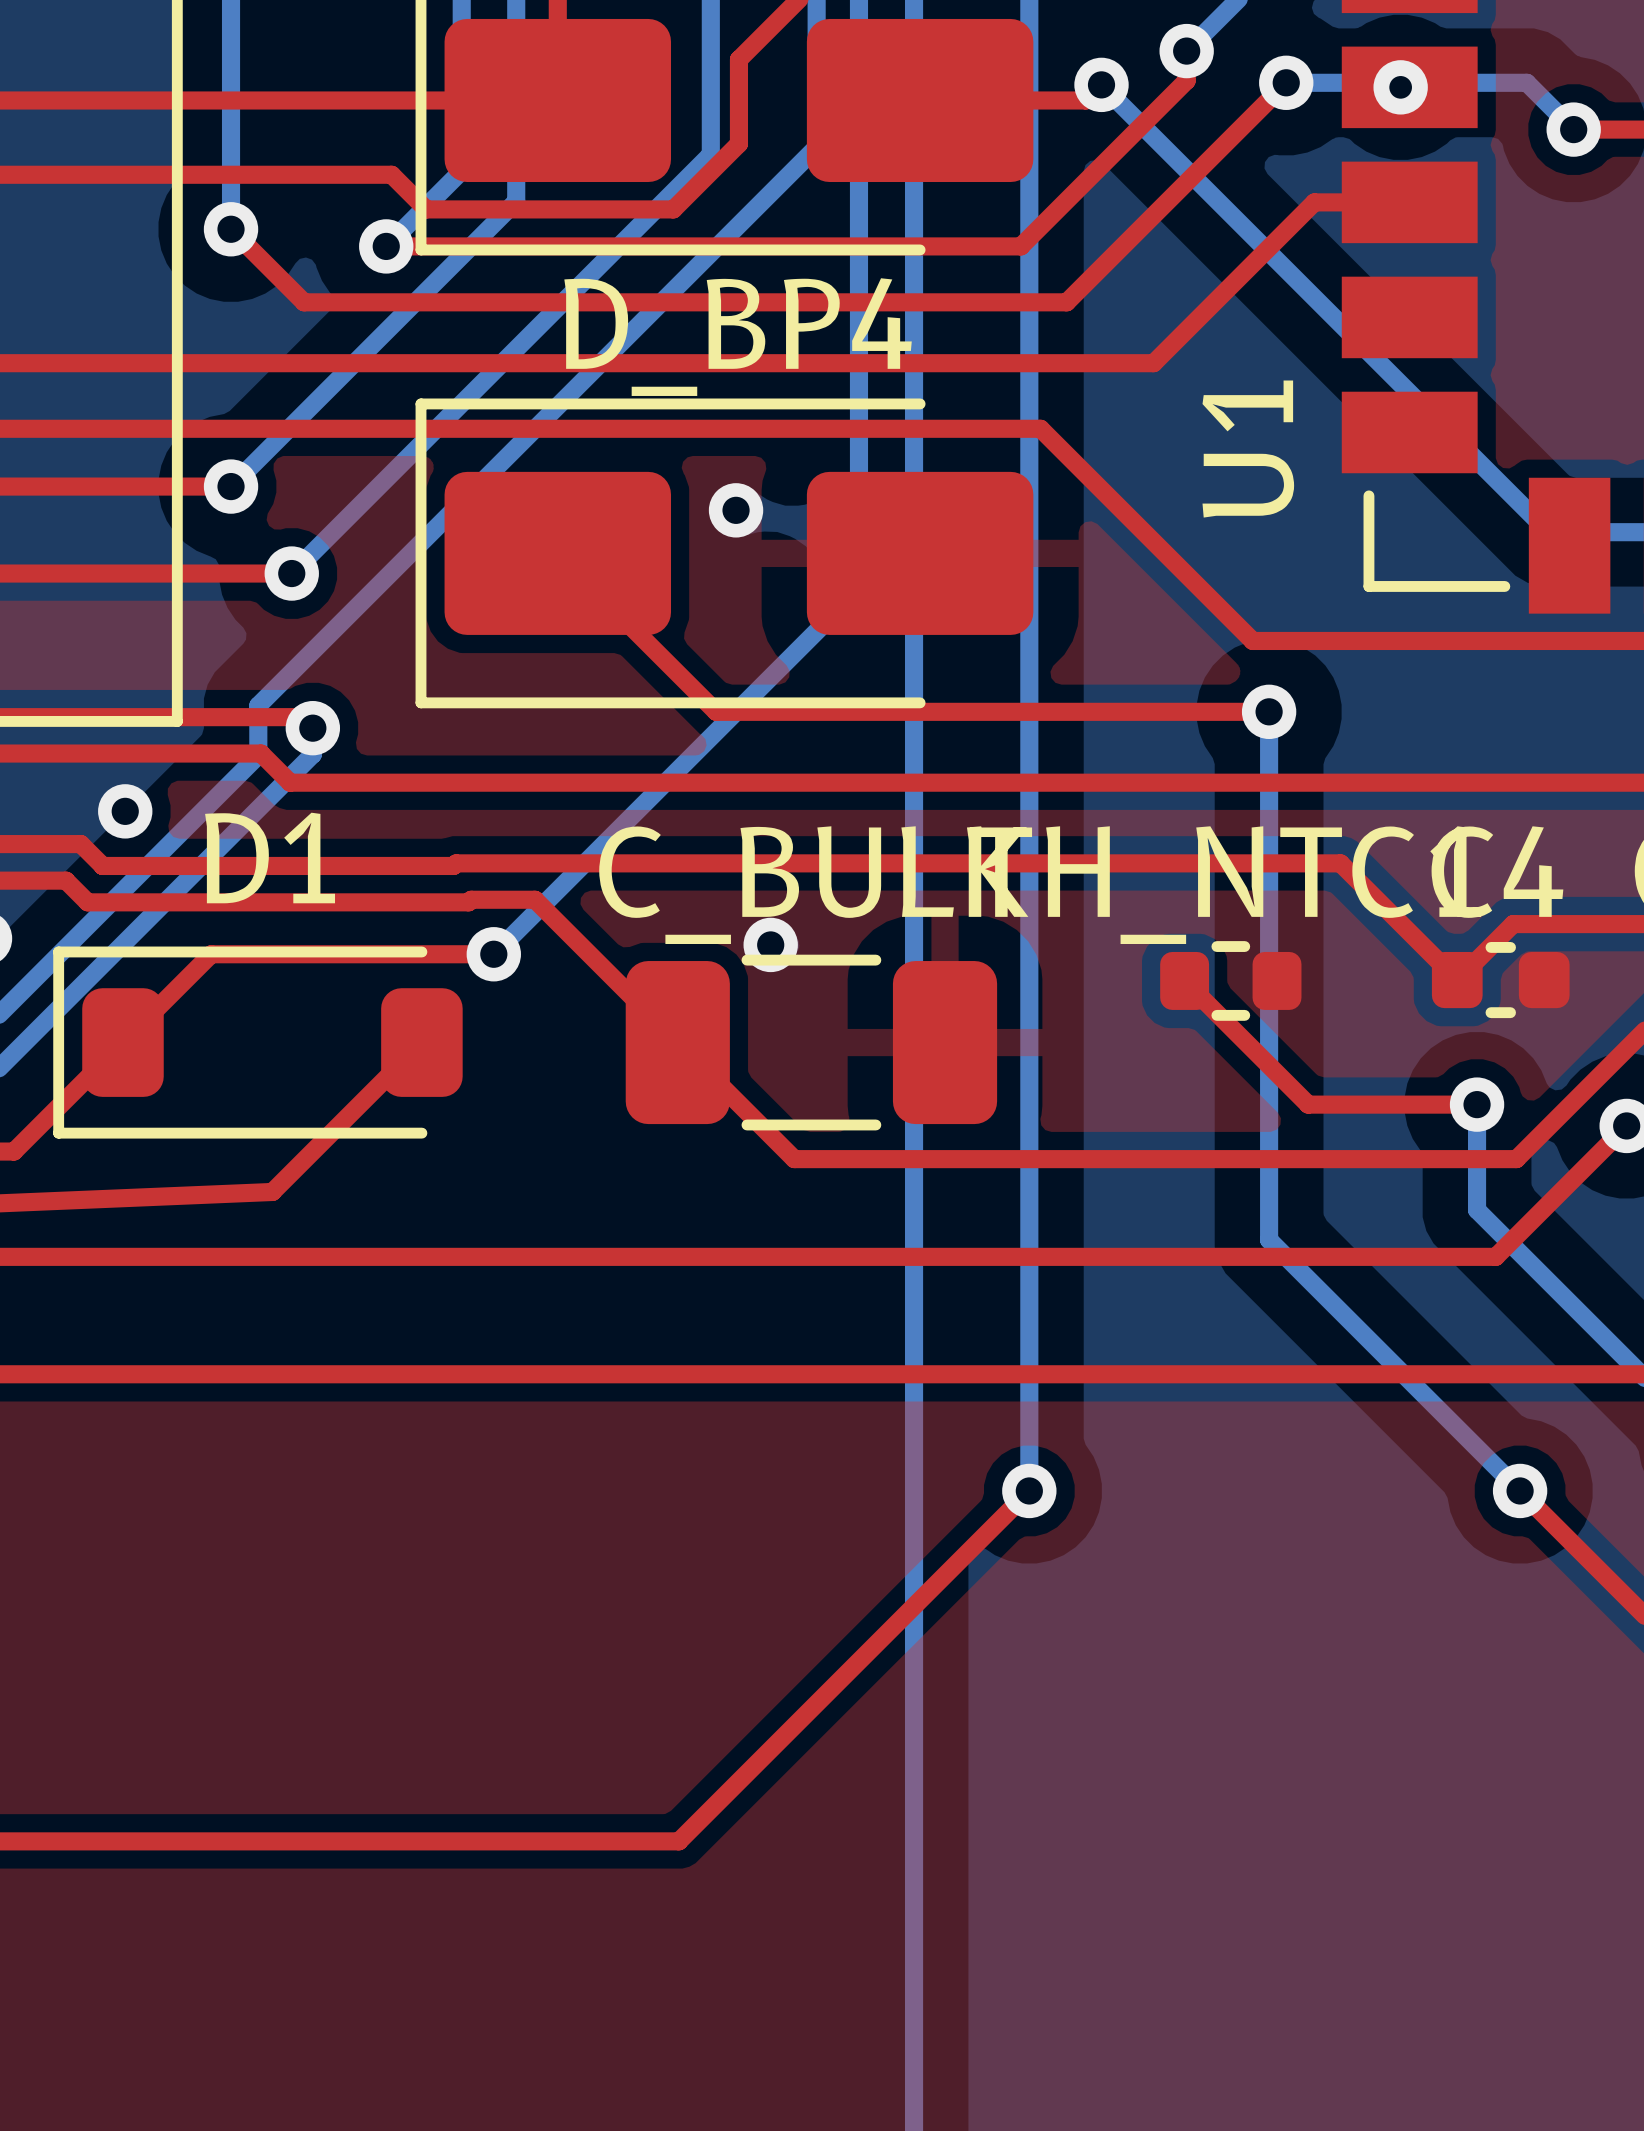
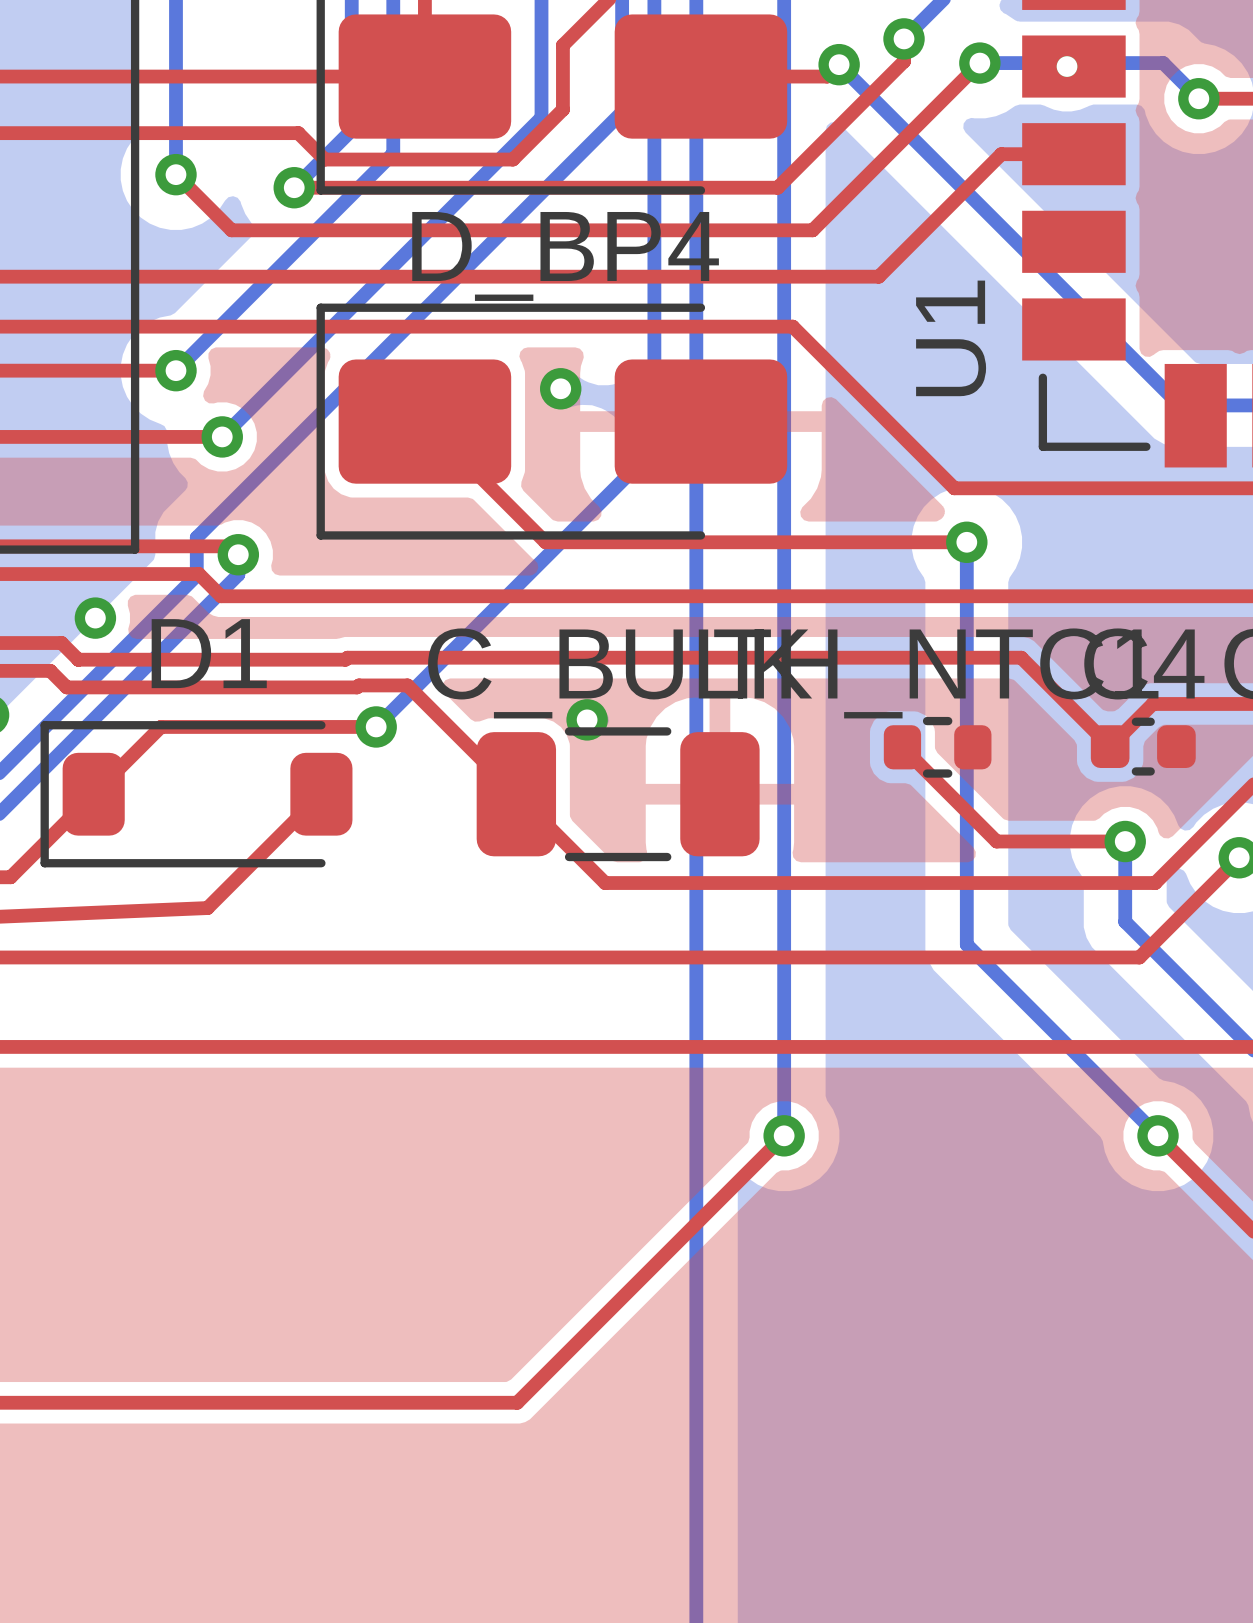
via size: [1373, 60, 1428, 115] -> [1056, 56, 1078, 77]

